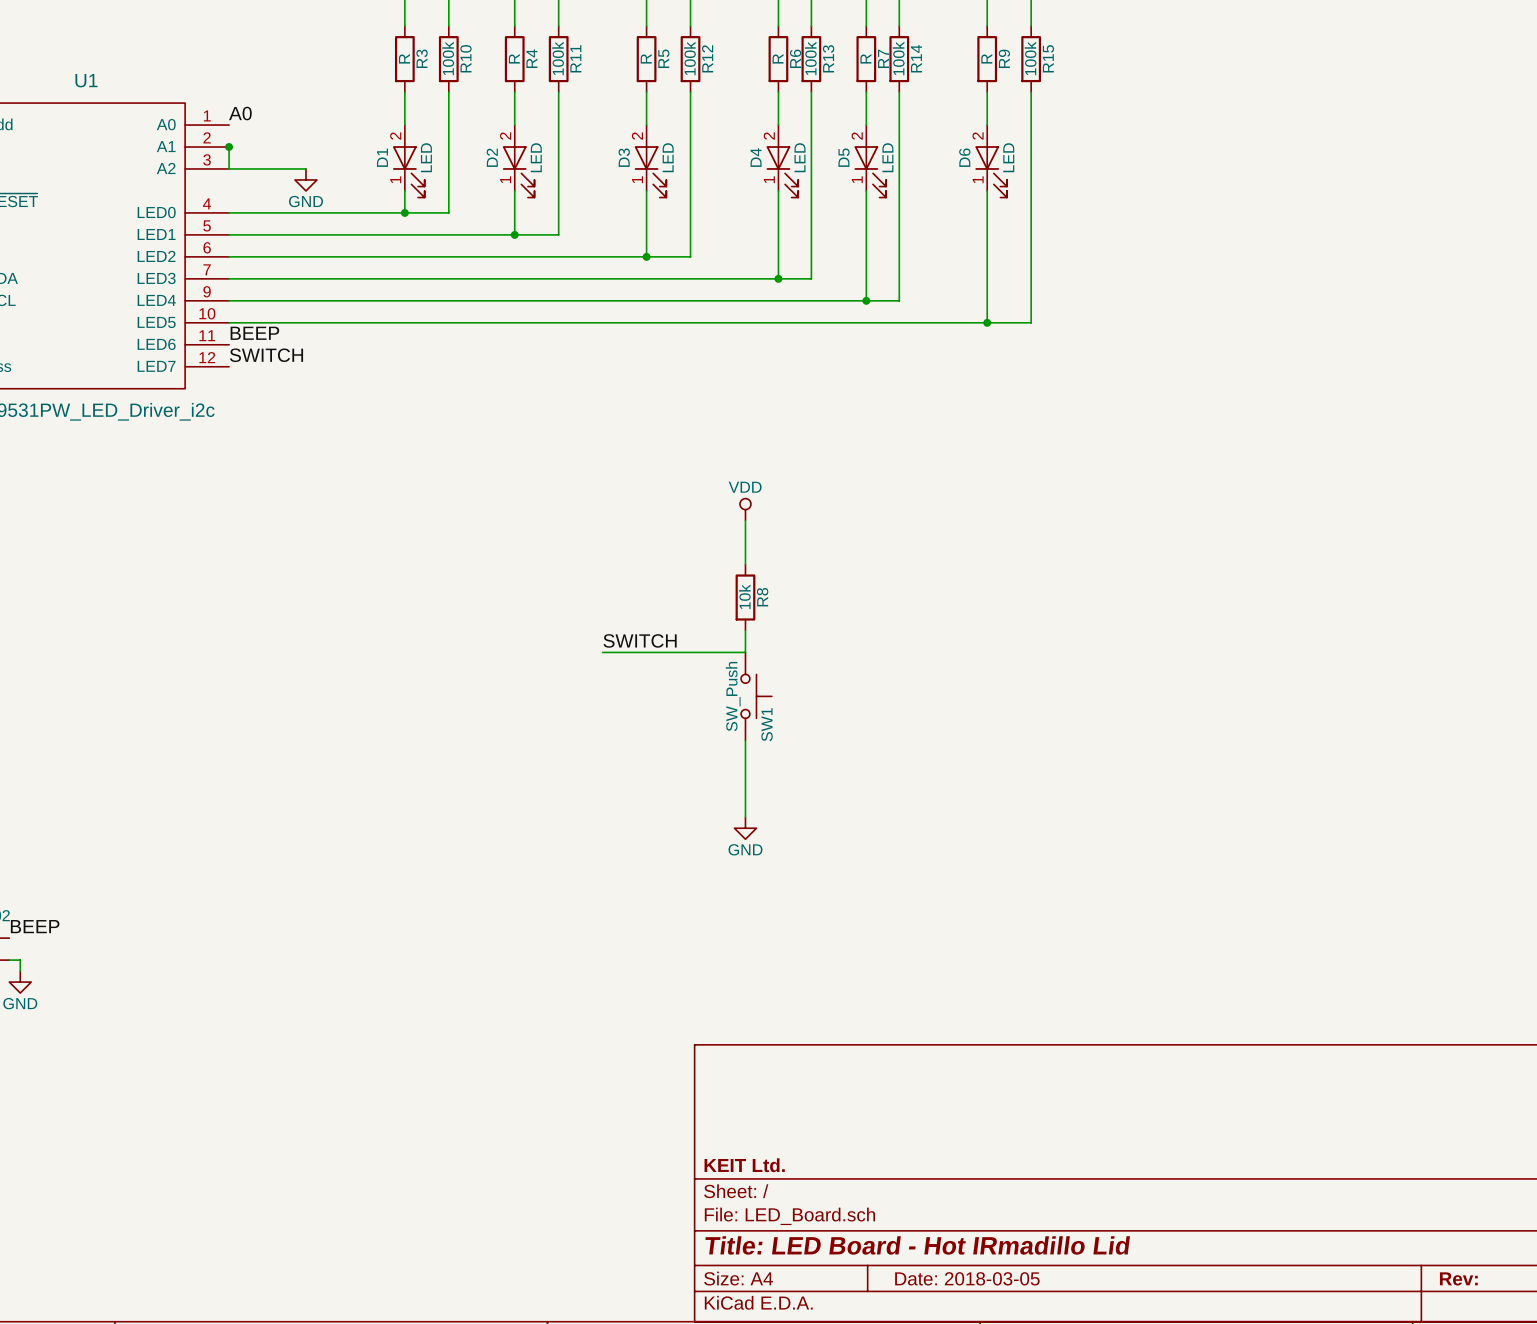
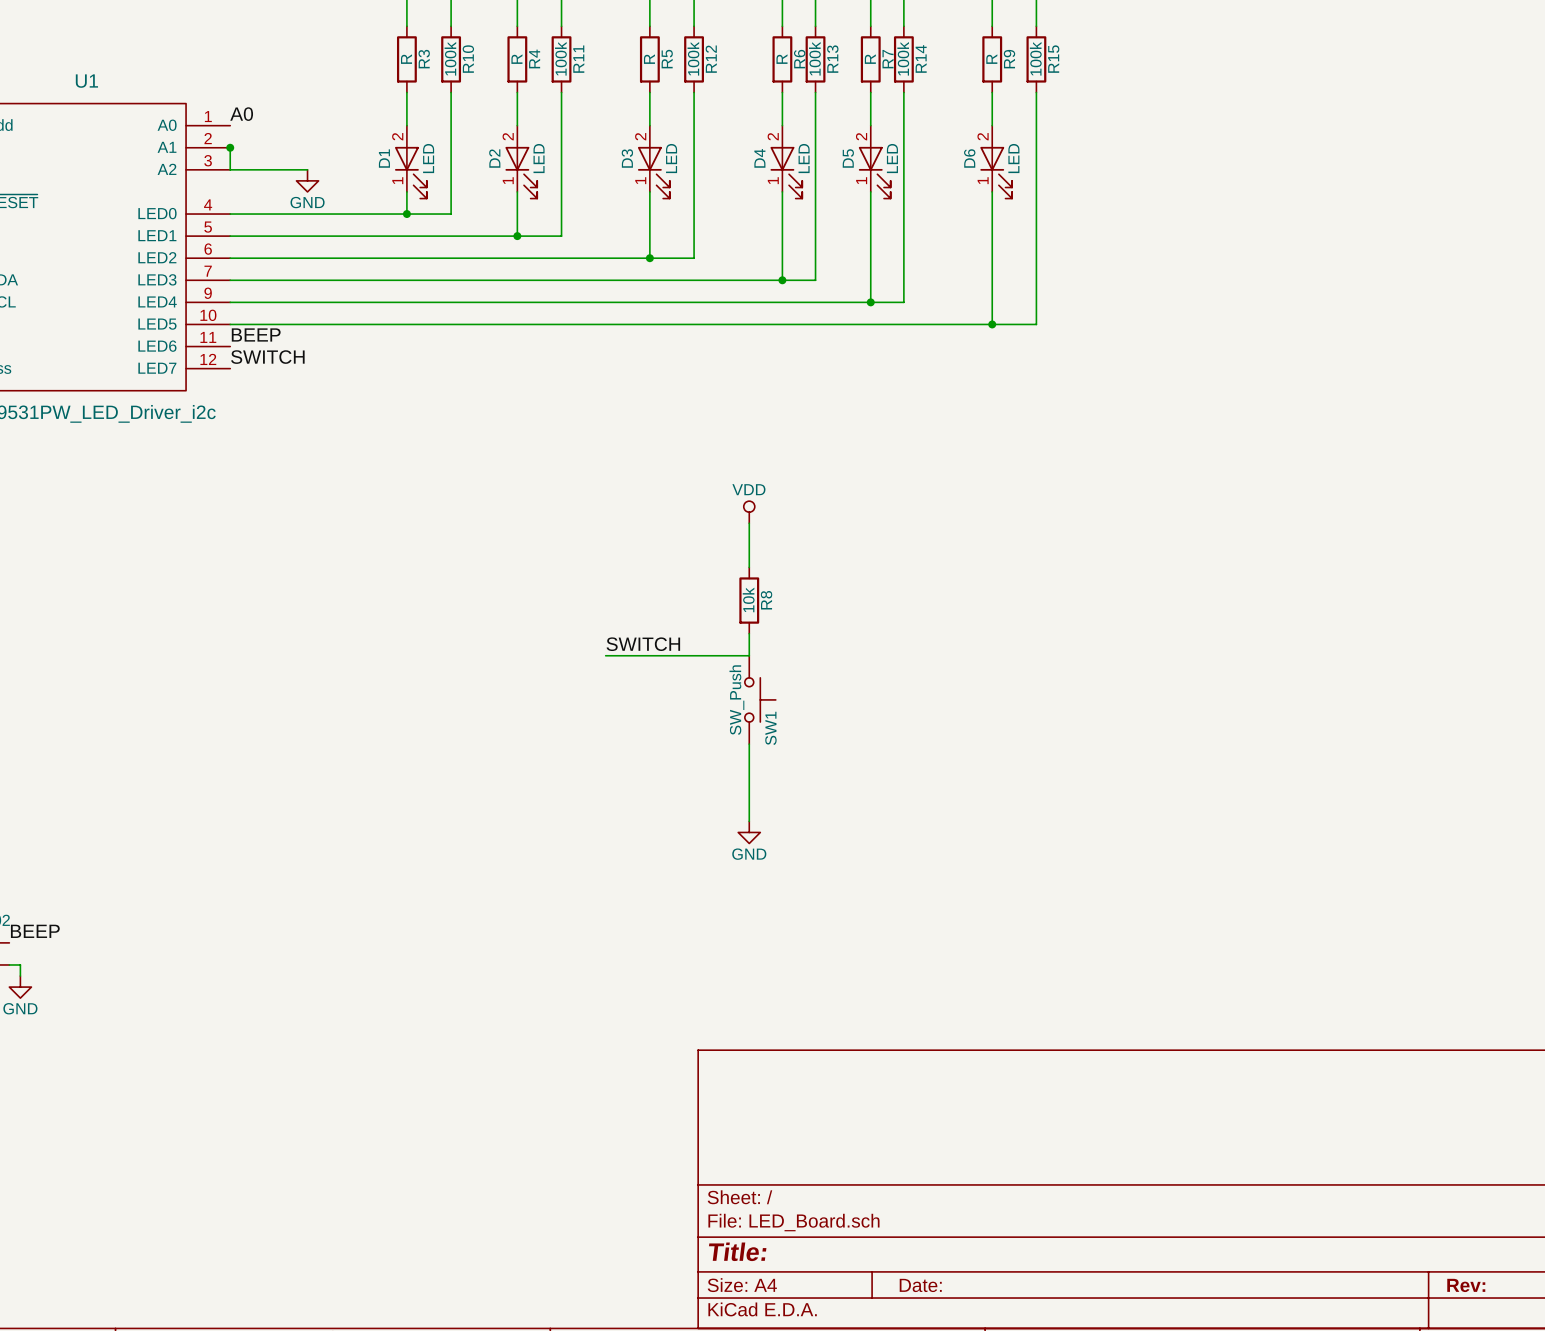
title block: KEIT Ltd. (744, 1165) -> none
title block: Title: LED Board - Hot IRmadillo Lid (917, 1245) -> Title: (737, 1251)
title block: Date: 2018-03-05 (967, 1278) -> Date: (920, 1285)

